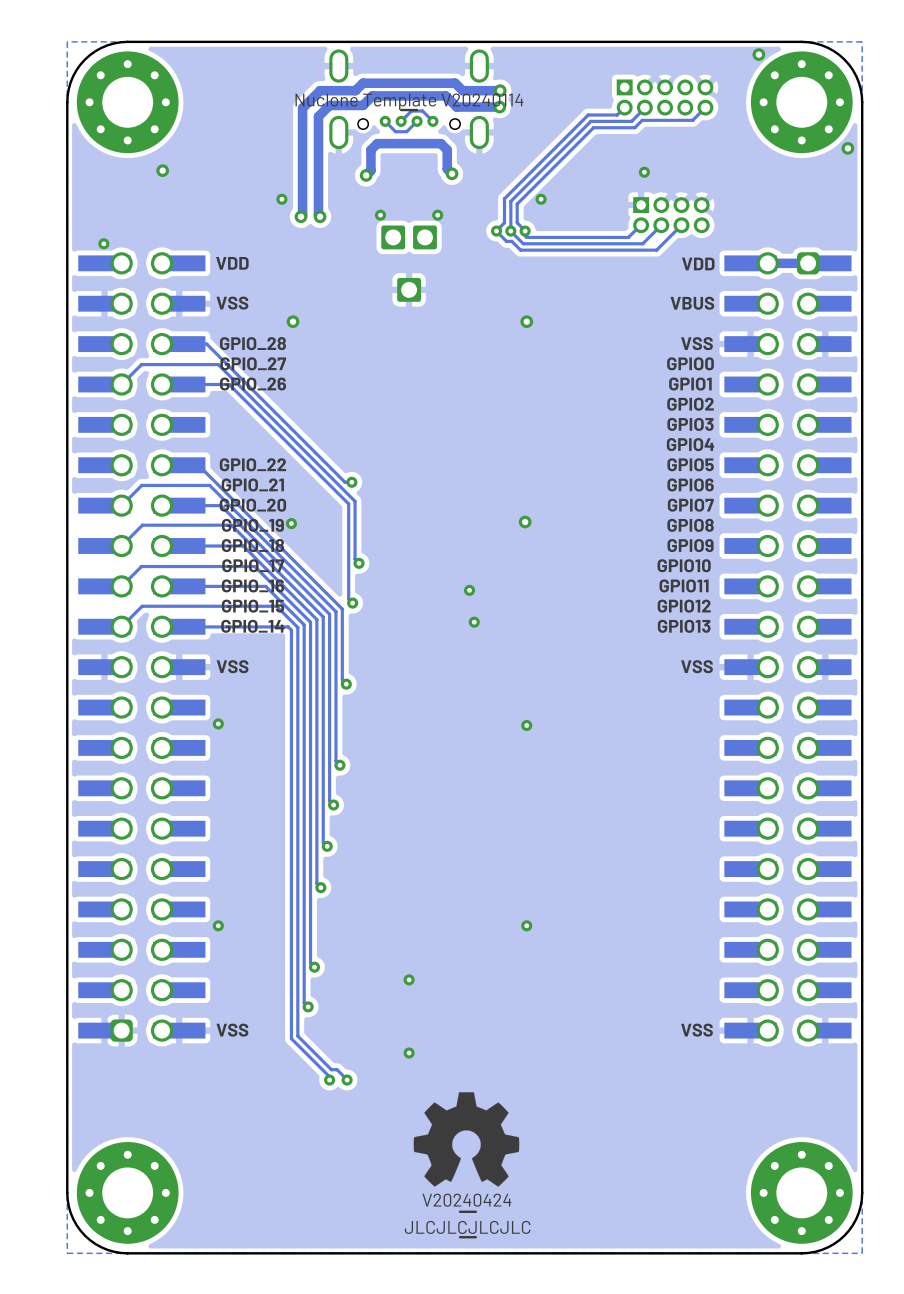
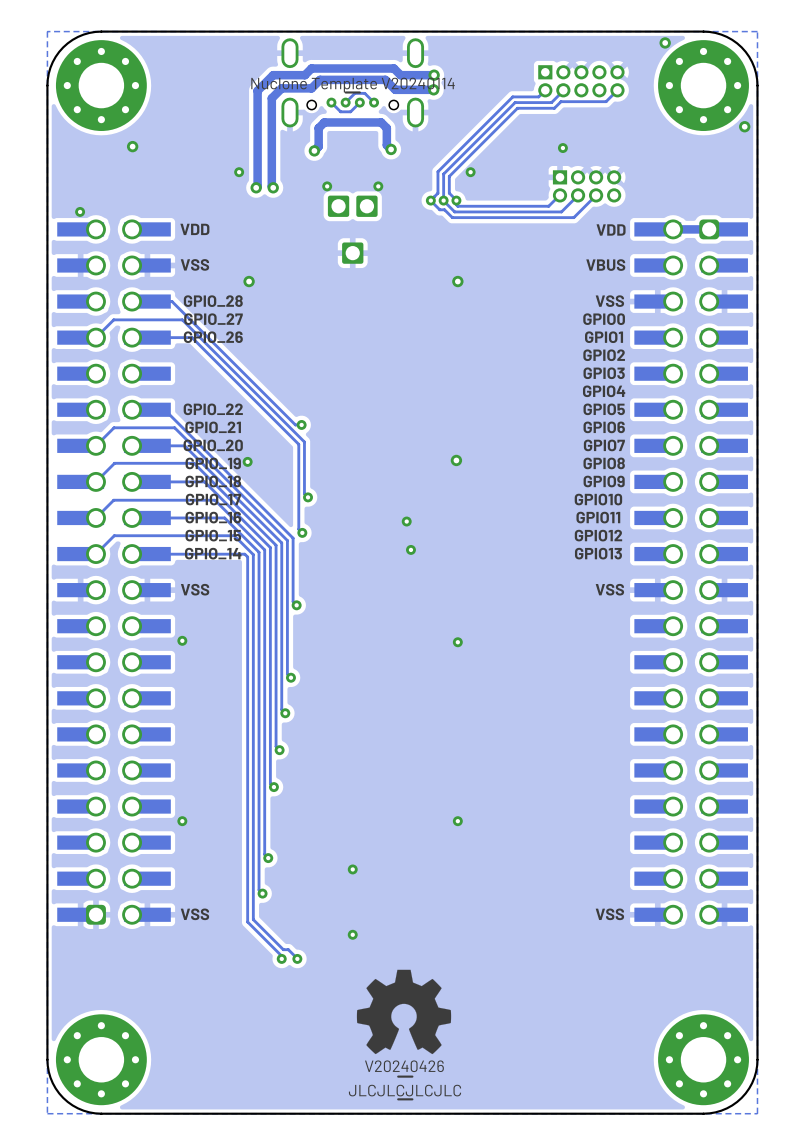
drawing shape: [422, 1193, 512, 1213] -> [365, 1060, 444, 1078]

